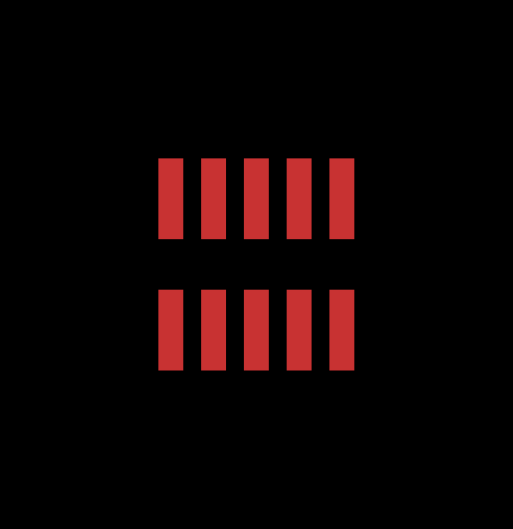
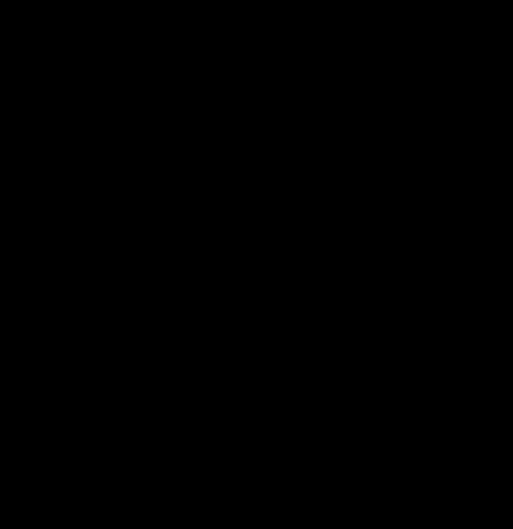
part: (256, 264) -> none

